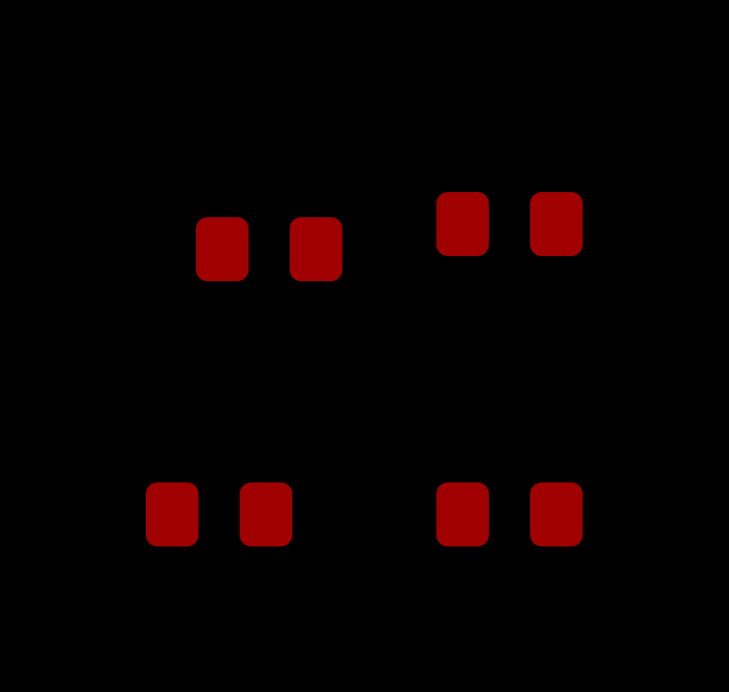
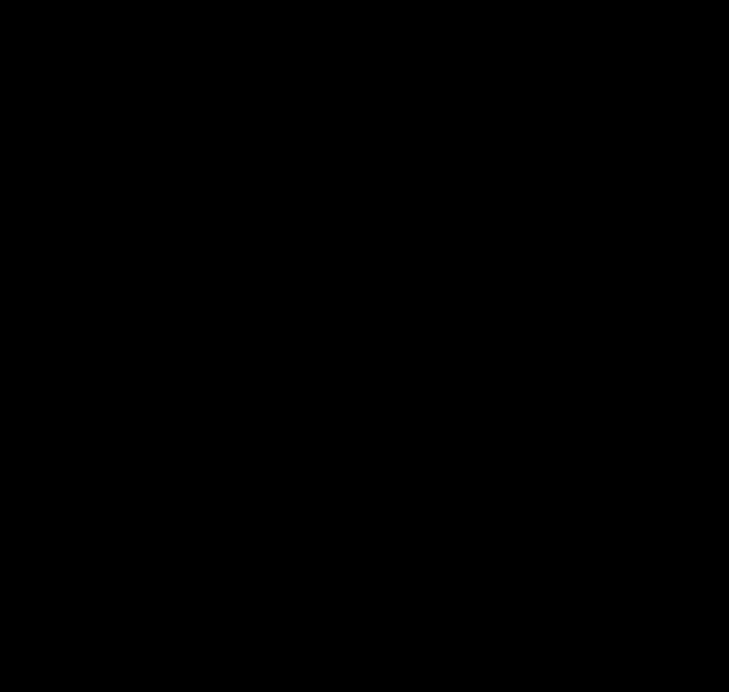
part: (509, 224) -> none
part: (269, 249) -> none
part: (219, 514) -> none
part: (509, 514) -> none

